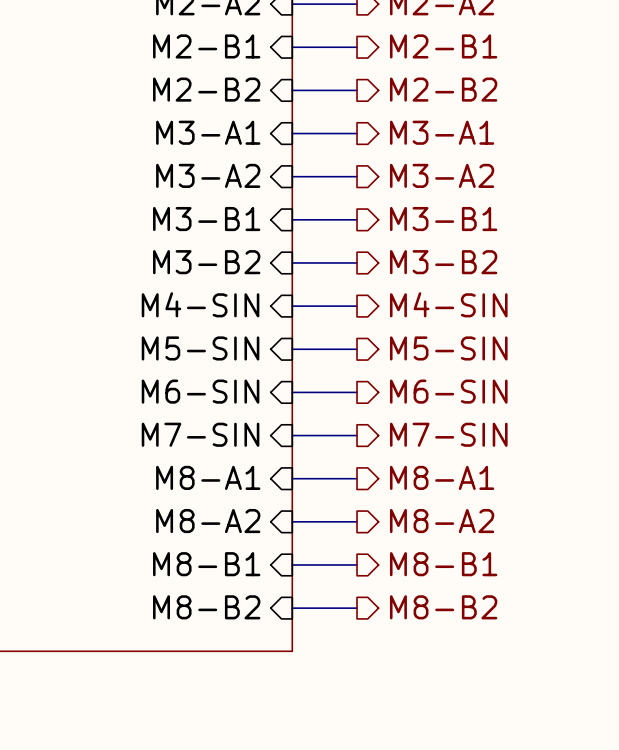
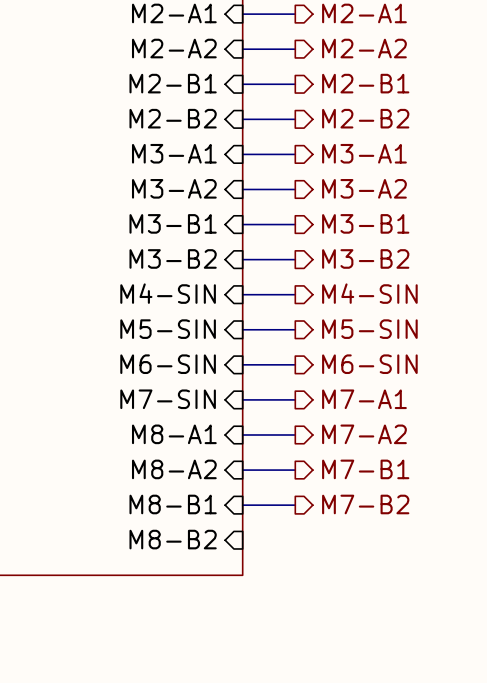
hierarchical label: M7-SIN (448, 434) -> M7-A1 (364, 399)
hierarchical label: M8-A1 (442, 477) -> M7-A2 (364, 434)
hierarchical label: M8-A2 (442, 521) -> M7-B1 (365, 469)
hierarchical label: M8-B1 (443, 564) -> M7-B2 (365, 504)
hierarchical label: M8-B2 (443, 607) -> none
wire: (292, 608) (357, 608) -> none

